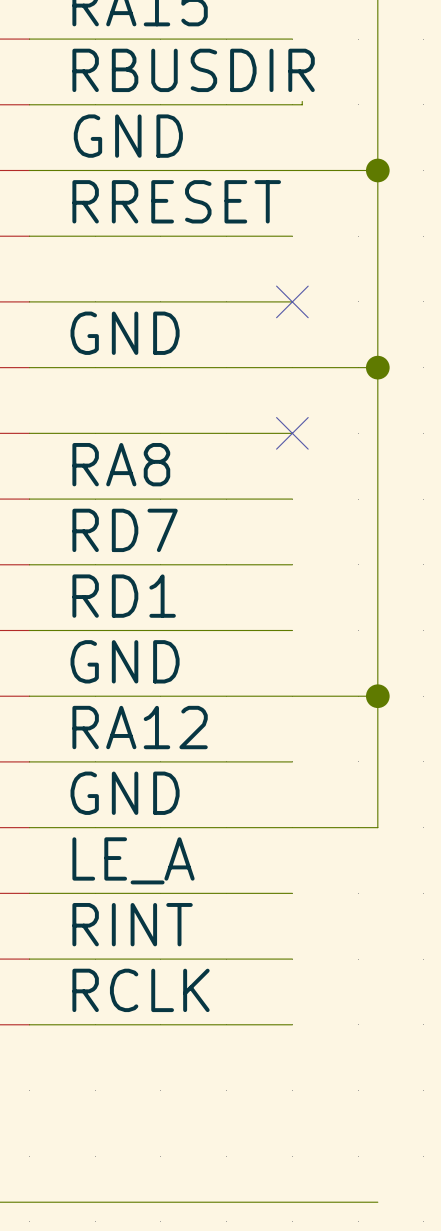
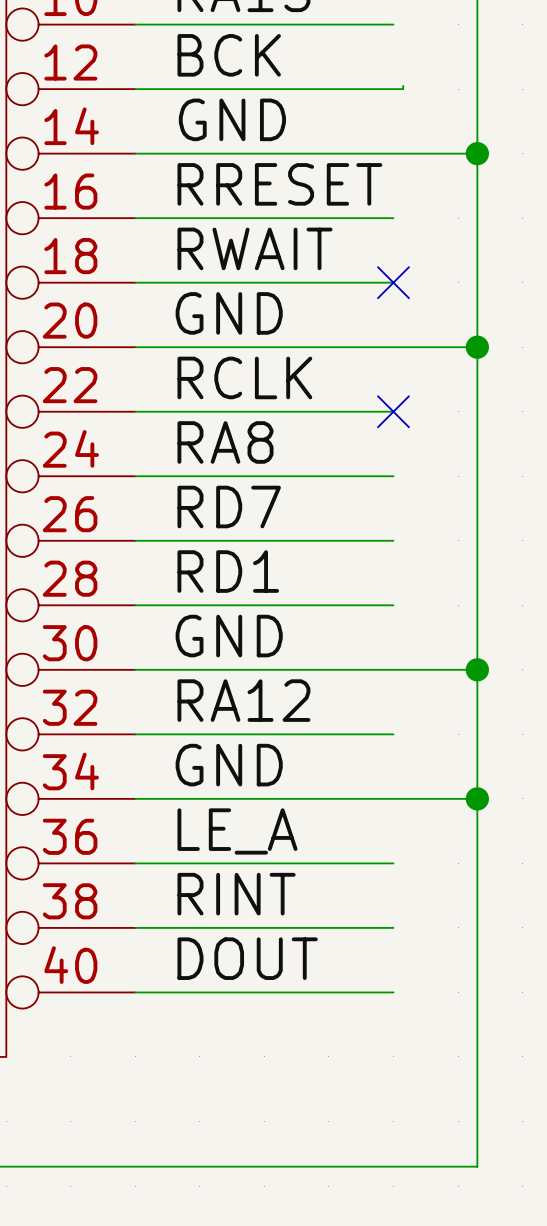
label: RBUSDIR (193, 70) -> BCK (229, 55)
label: none -> RWAIT (254, 248)
label: none -> RCLK (244, 377)
wire: none -> (477, 798) (477, 1166)
junction: none -> (477, 798)
label: RCLK (141, 990) -> DOUT (247, 958)

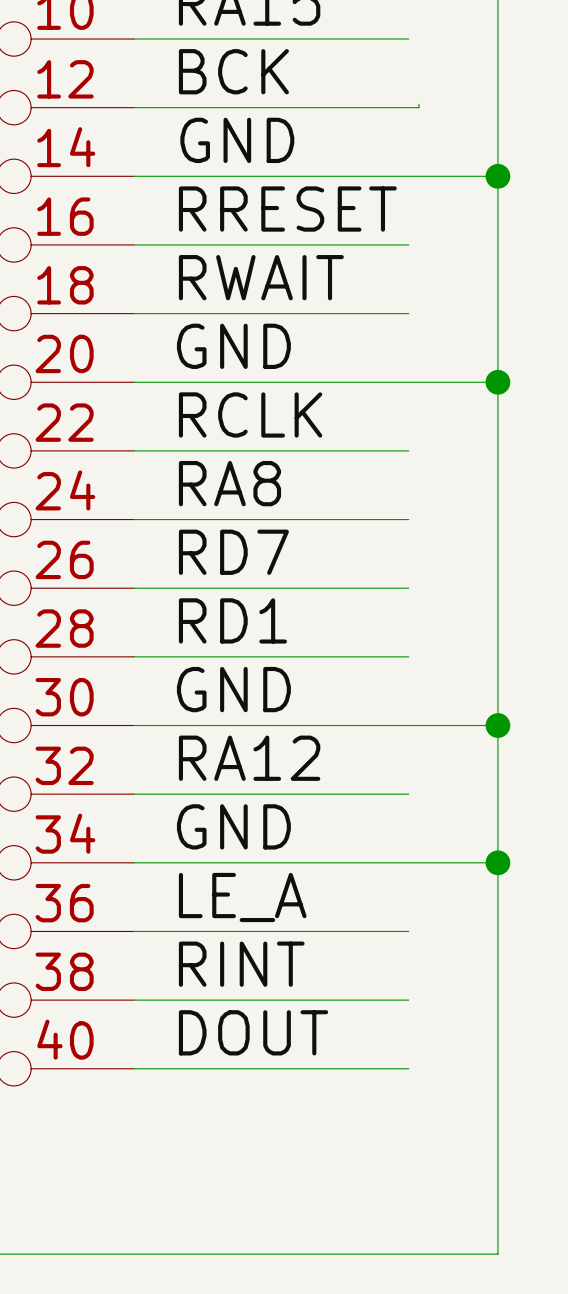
no-connect mark: (393, 282) -> none
no-connect mark: (393, 411) -> none

